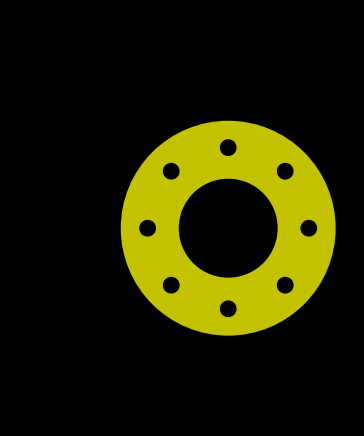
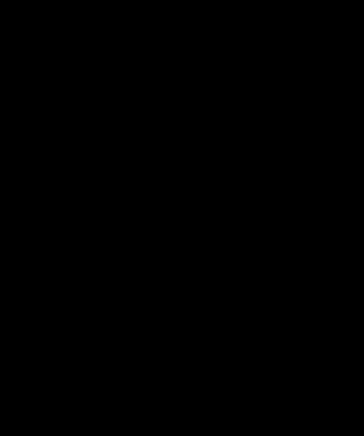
part: (228, 228) -> none

